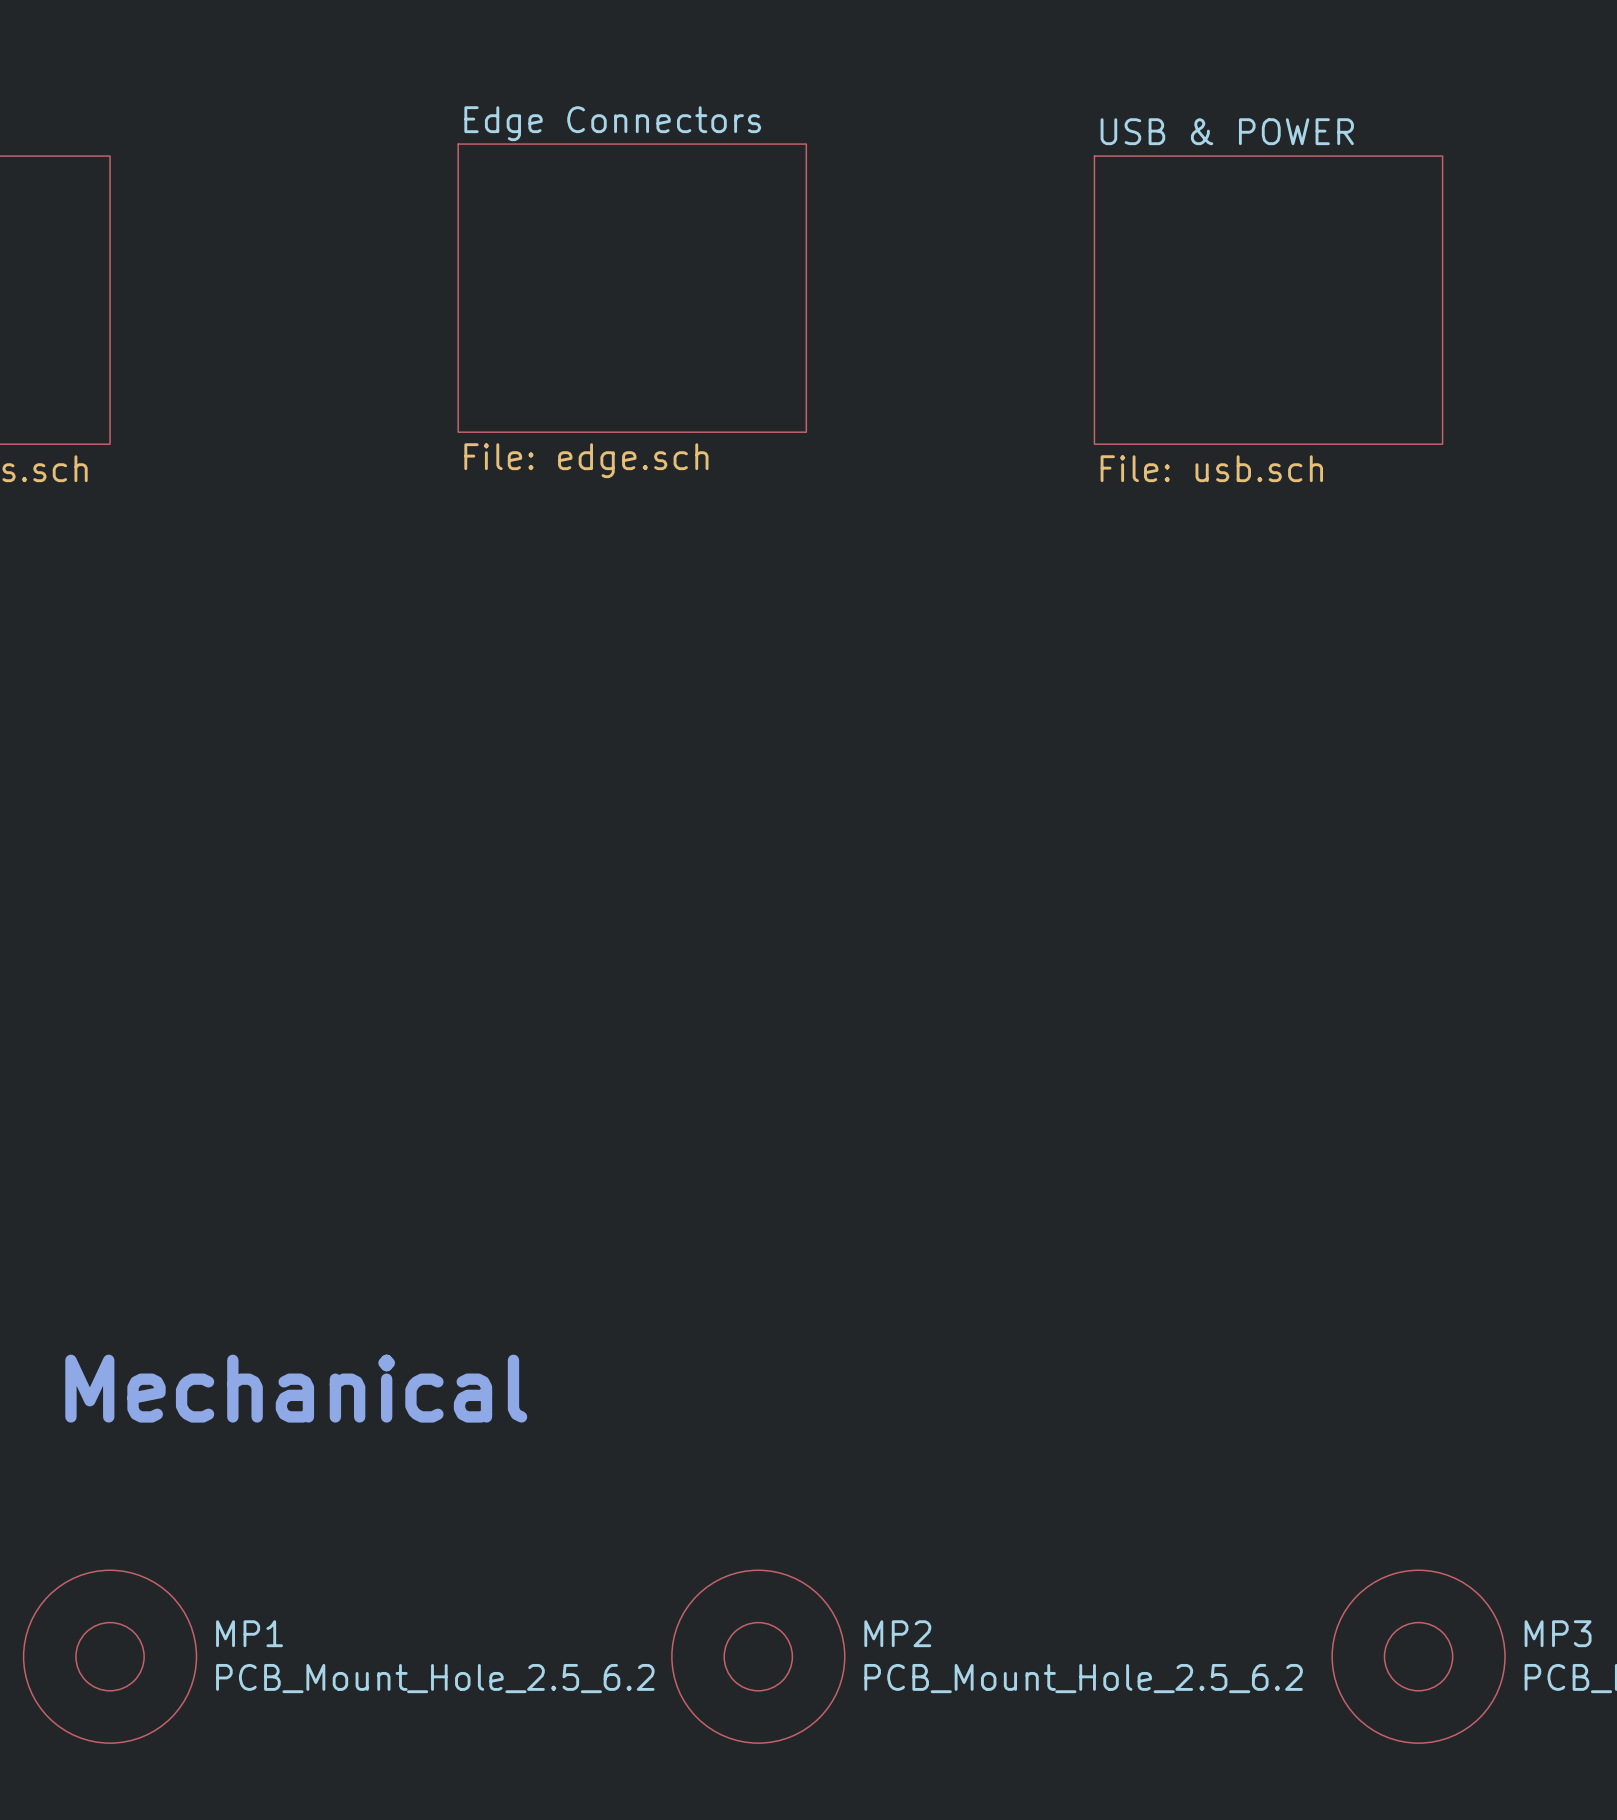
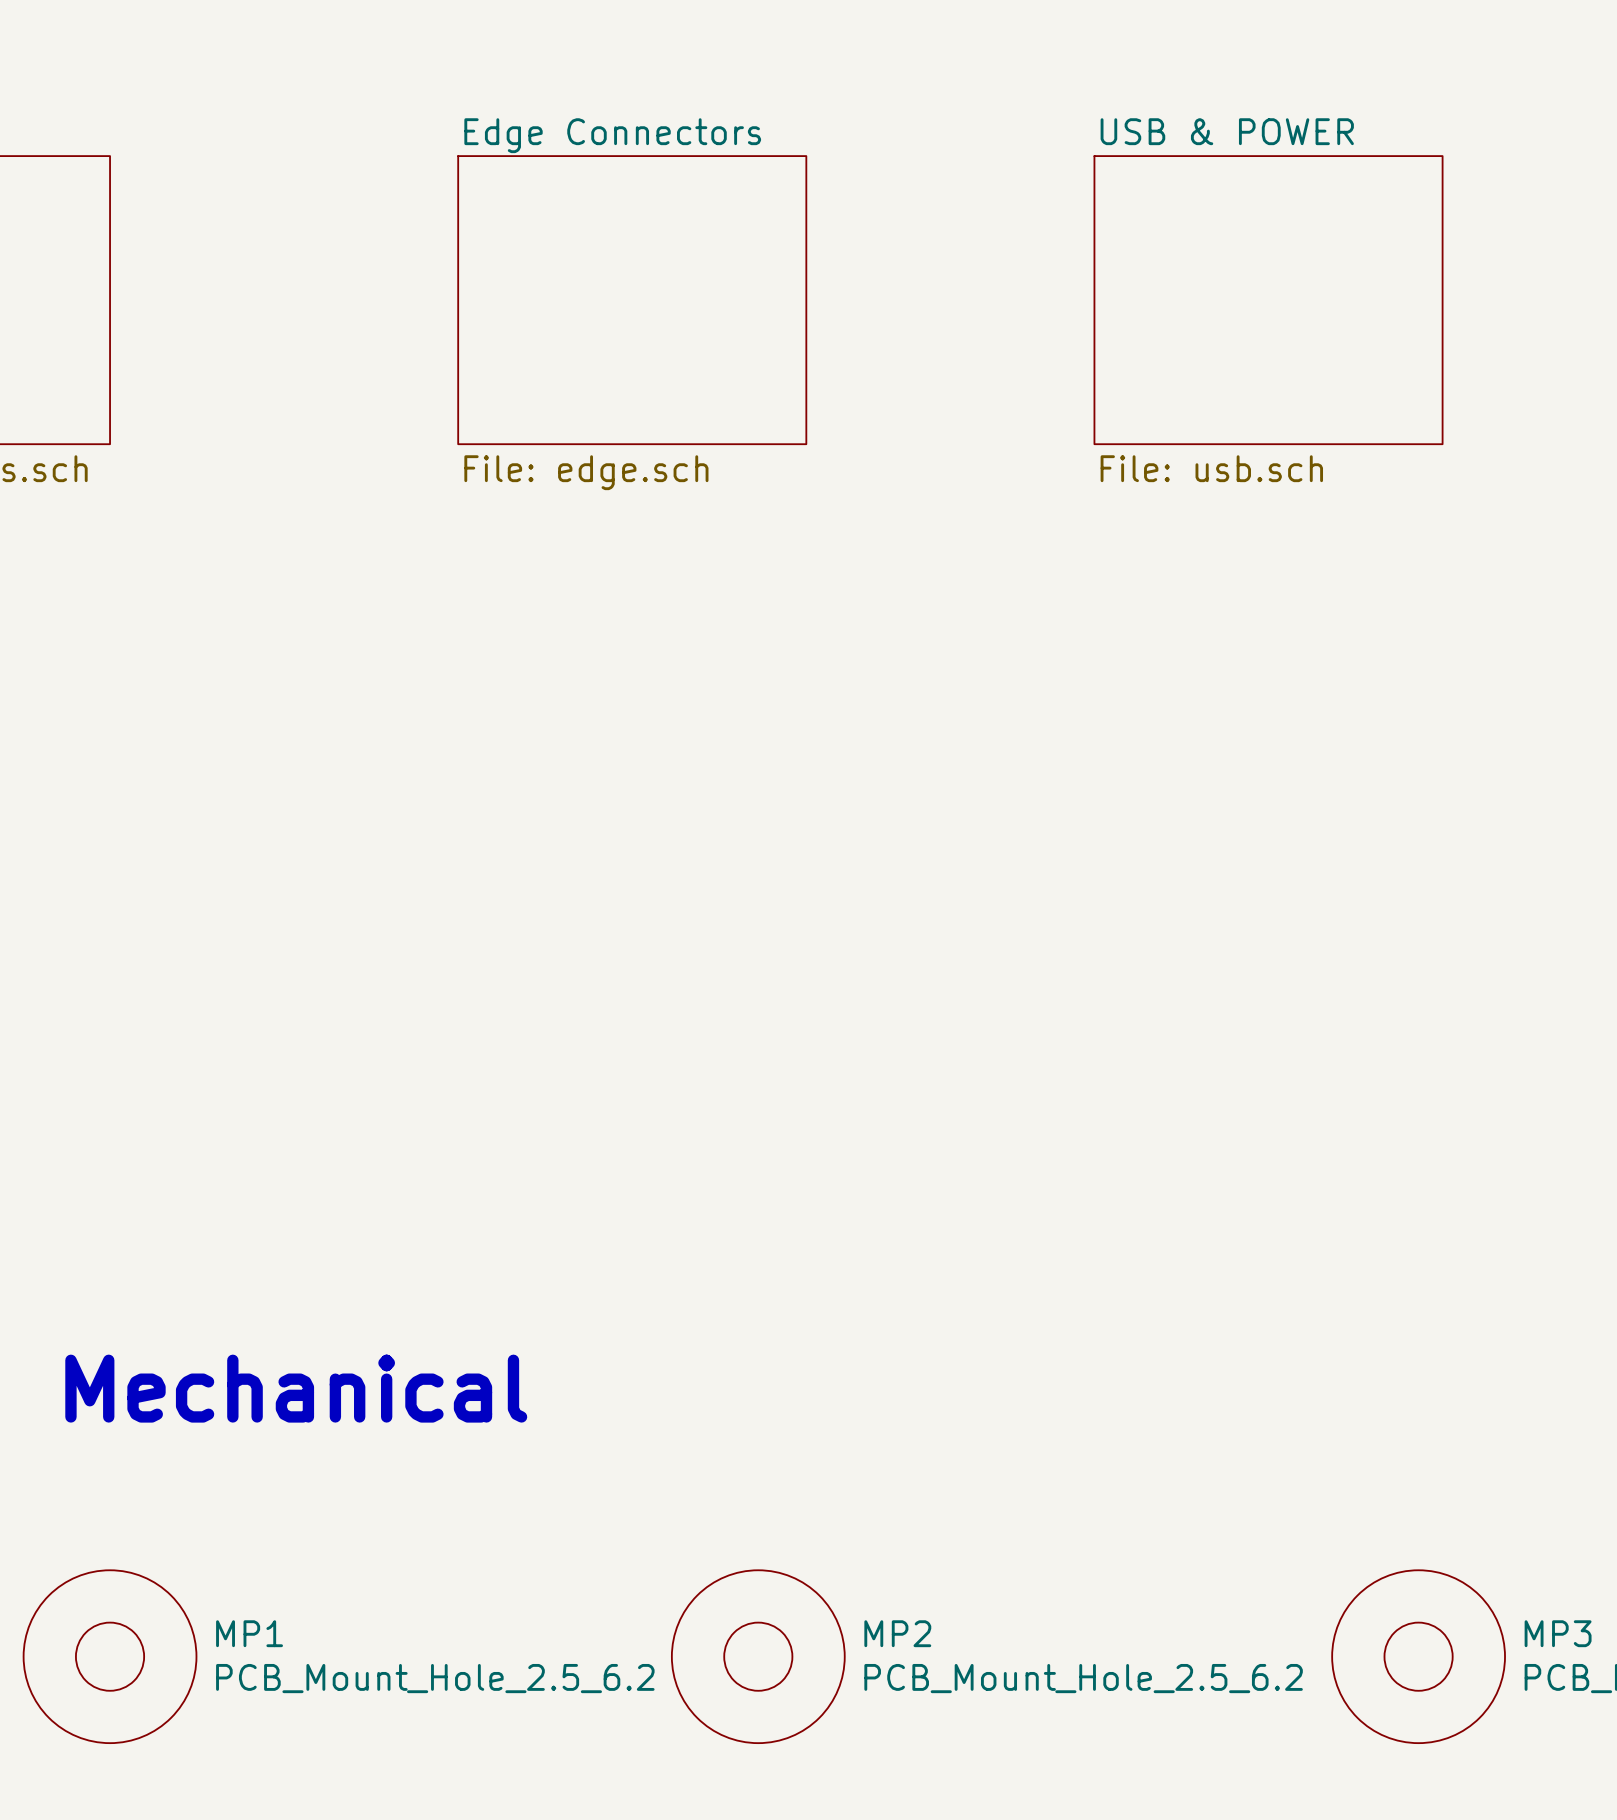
sheet Edge Connectors position: (632, 288) -> (632, 300)

